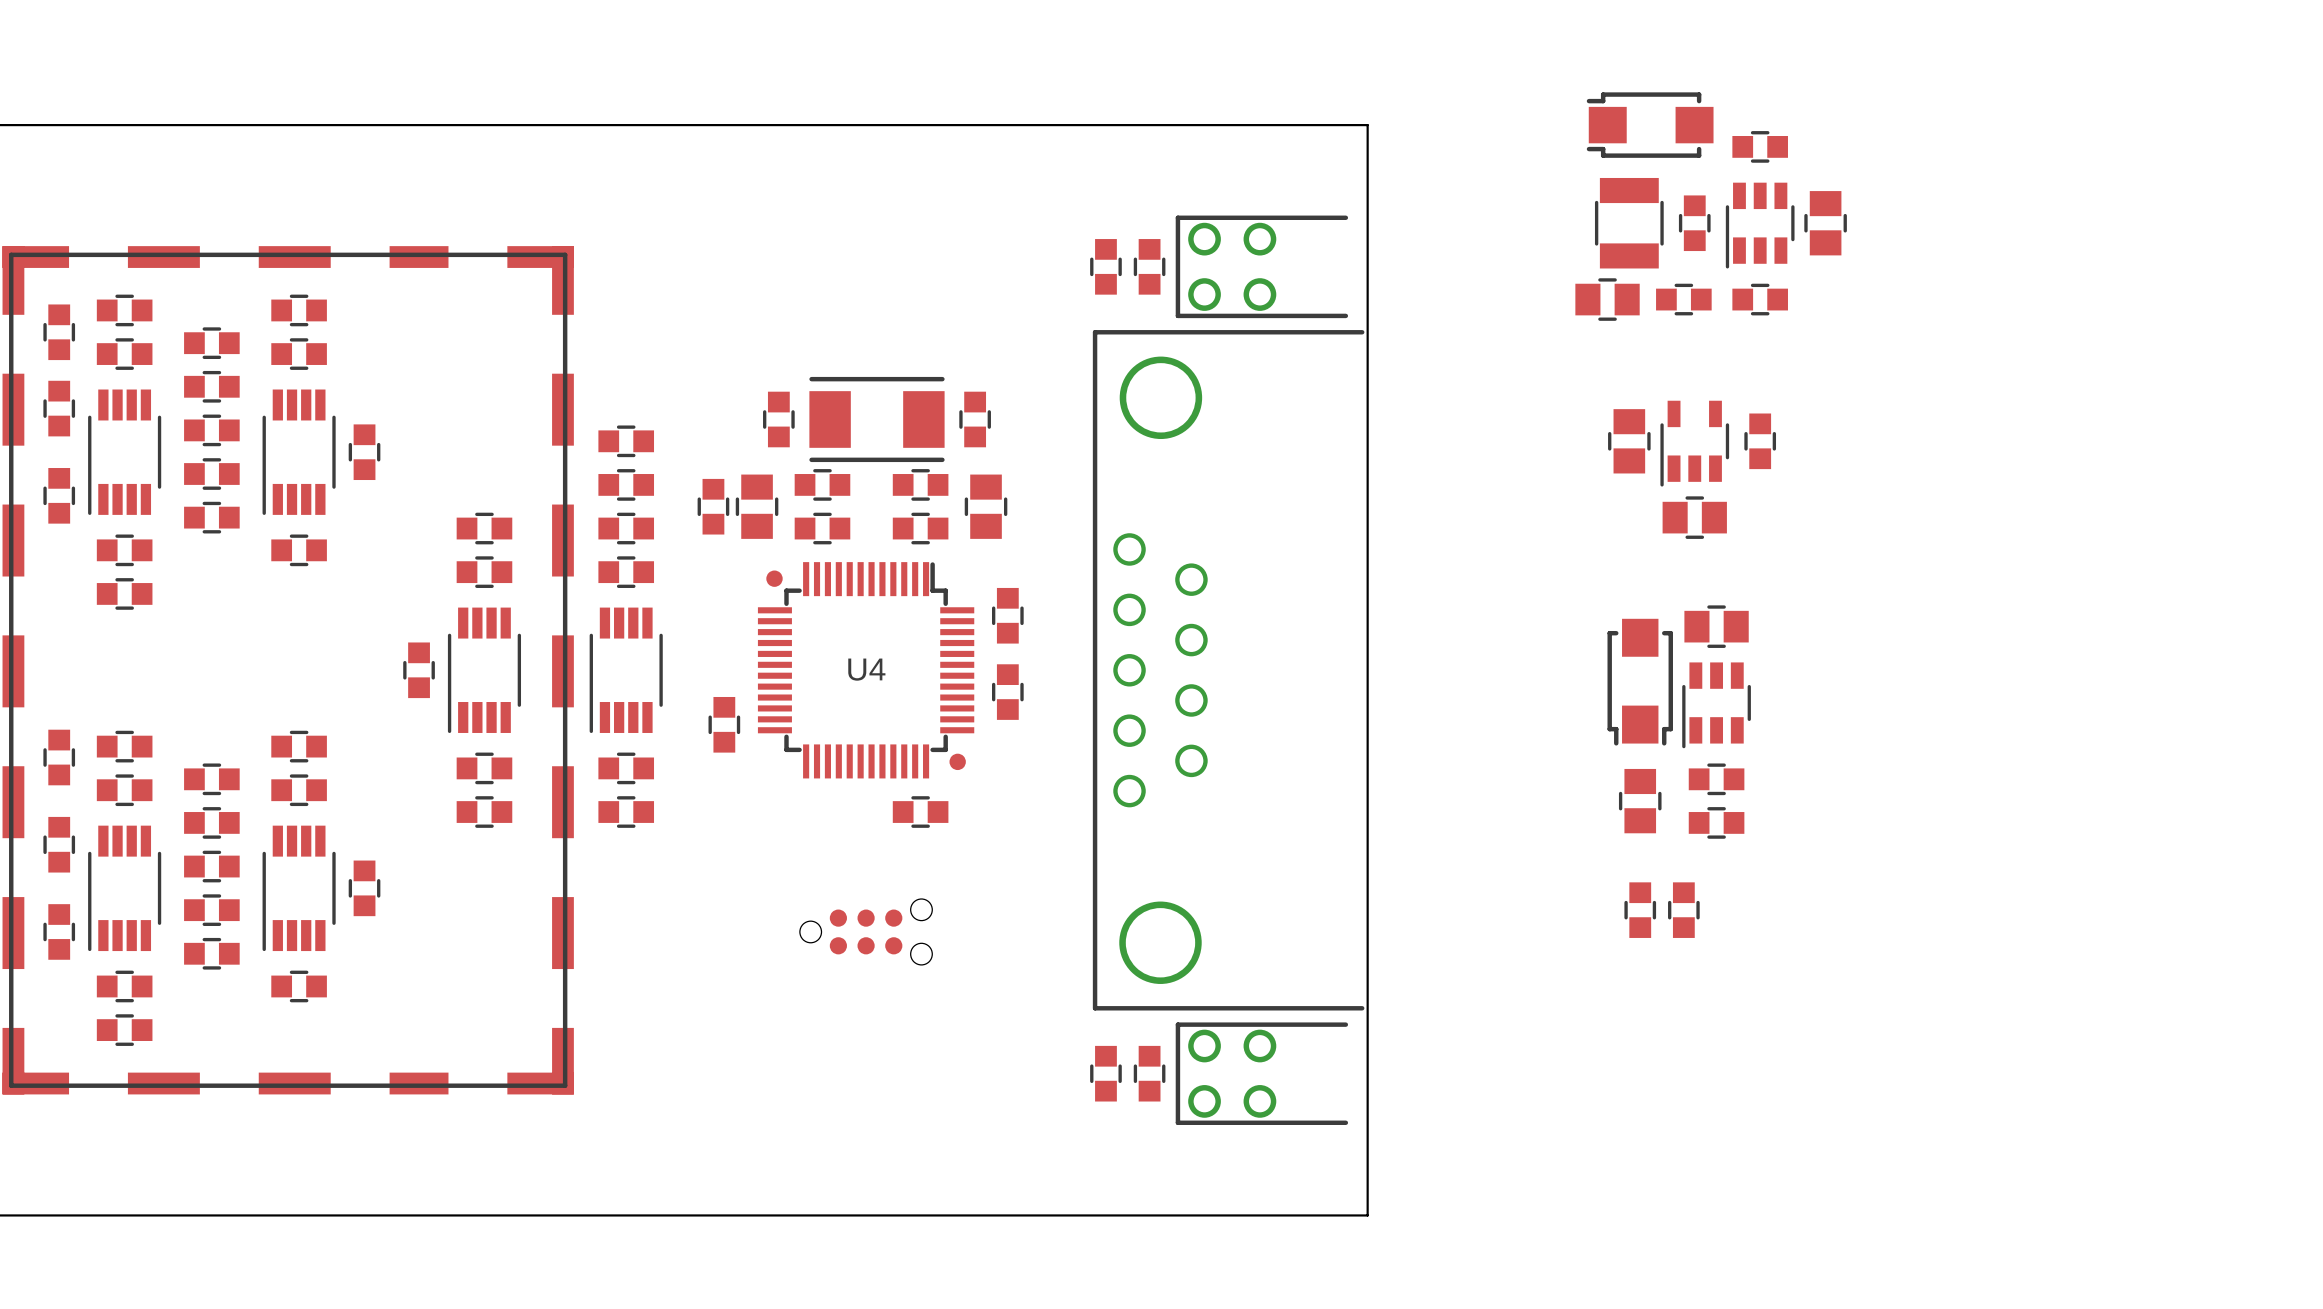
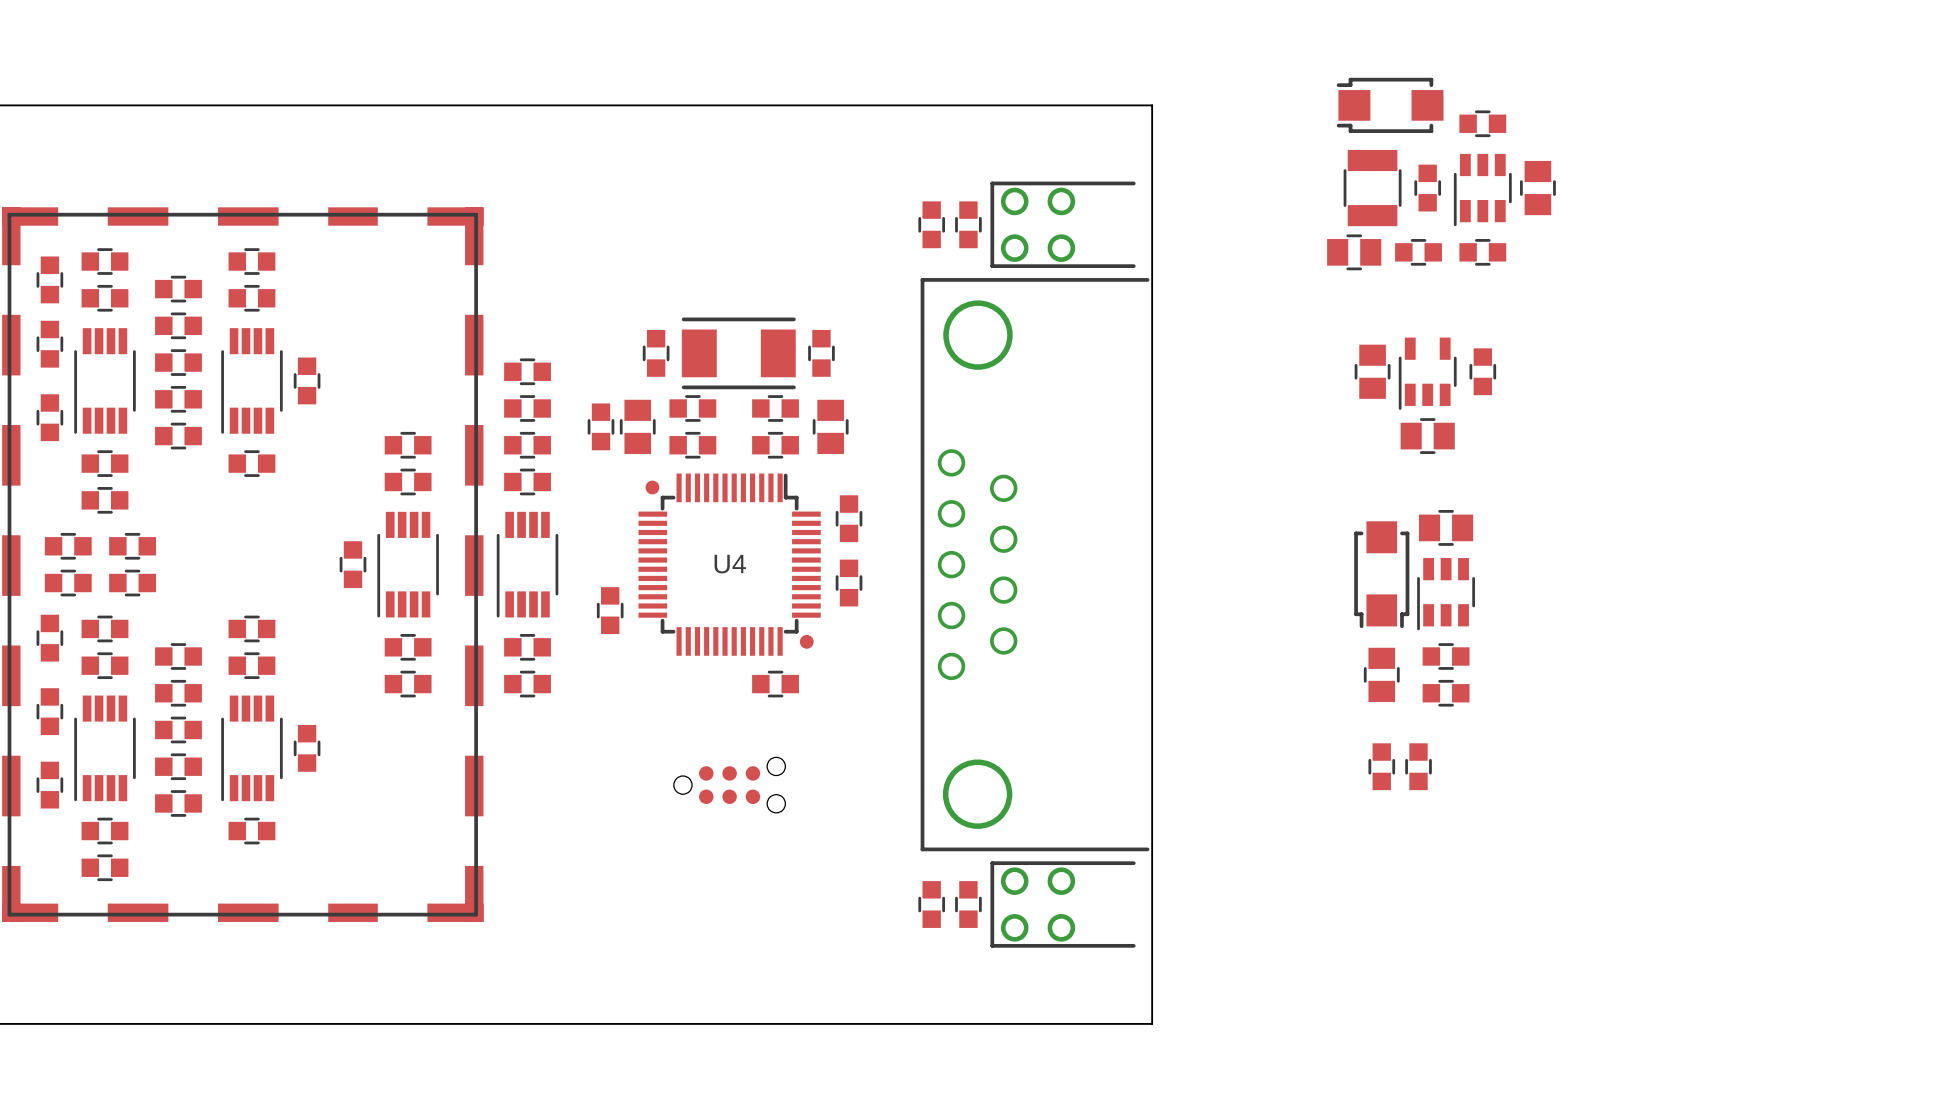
part: none -> (68, 546)
part: none -> (132, 546)
part: none -> (68, 583)
part: none -> (132, 583)

